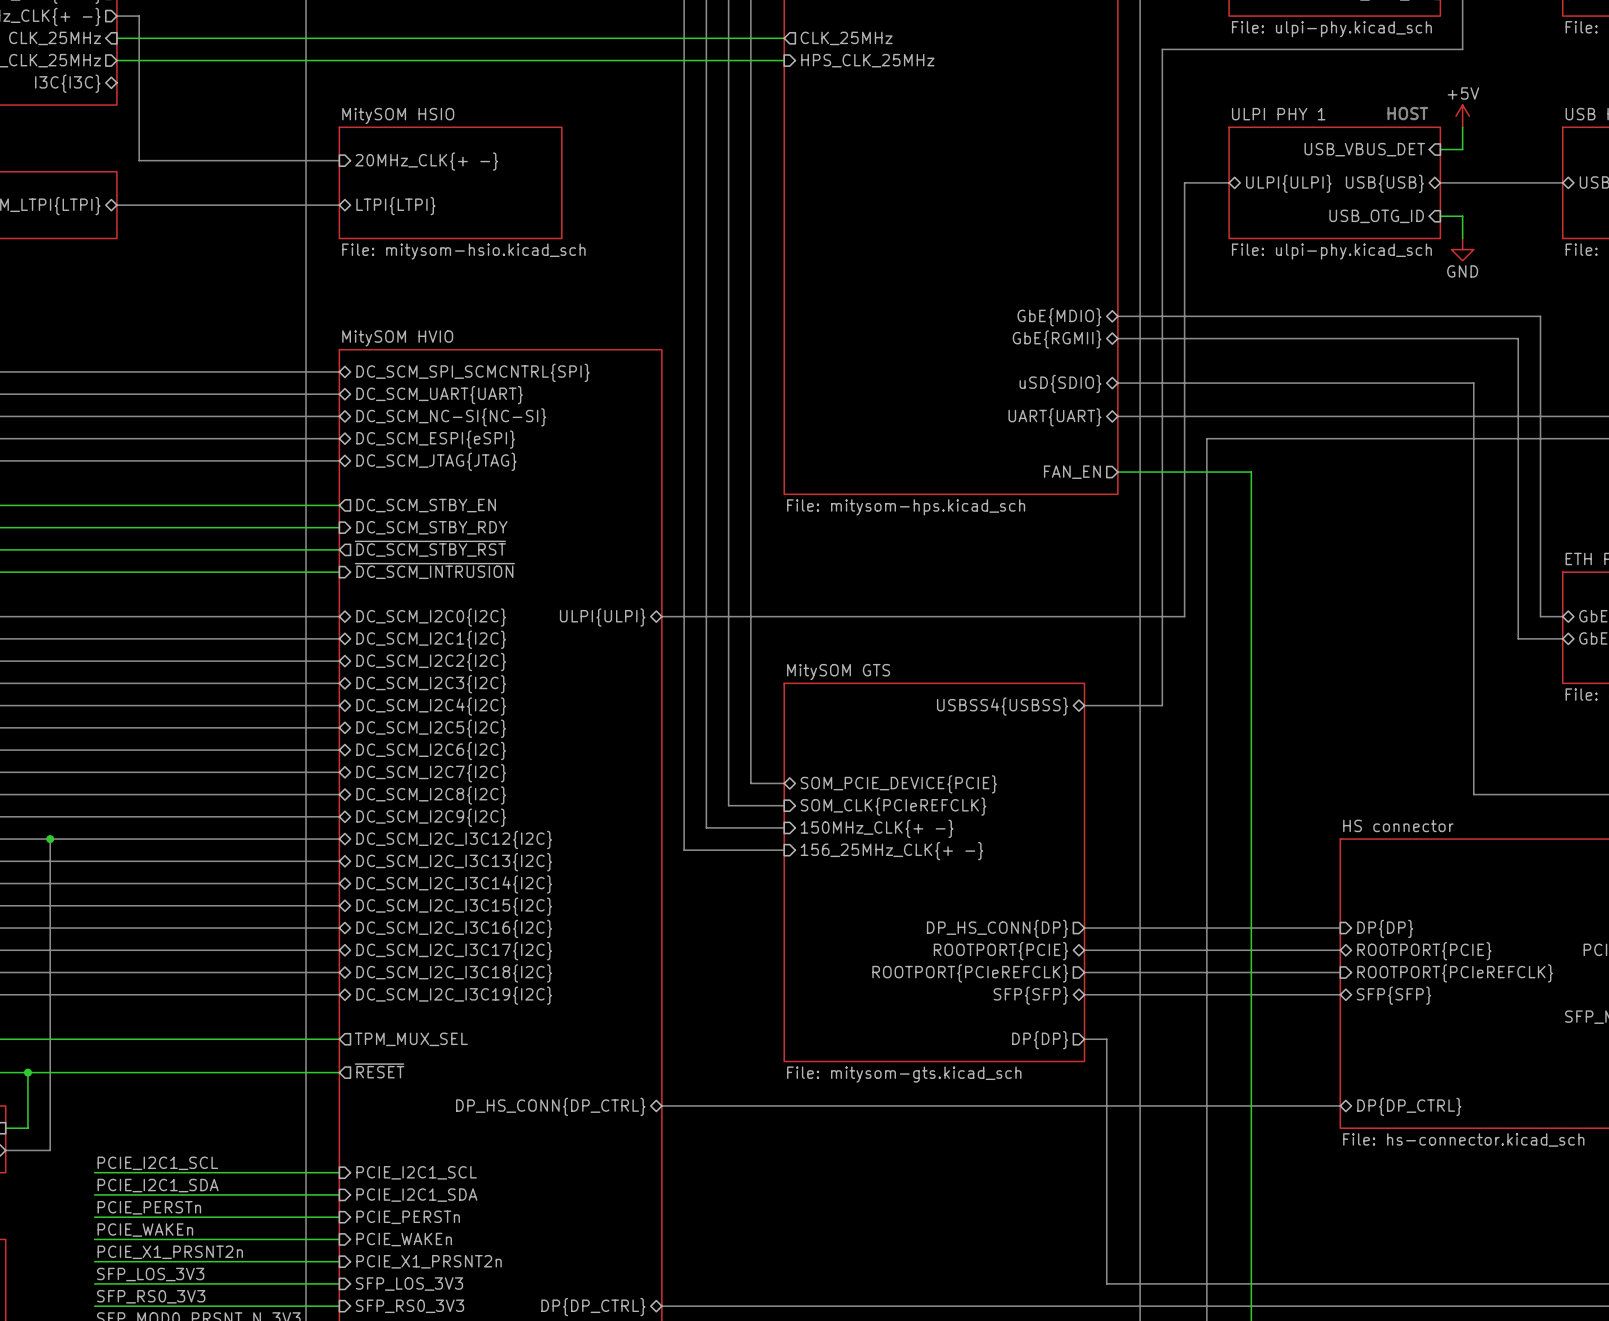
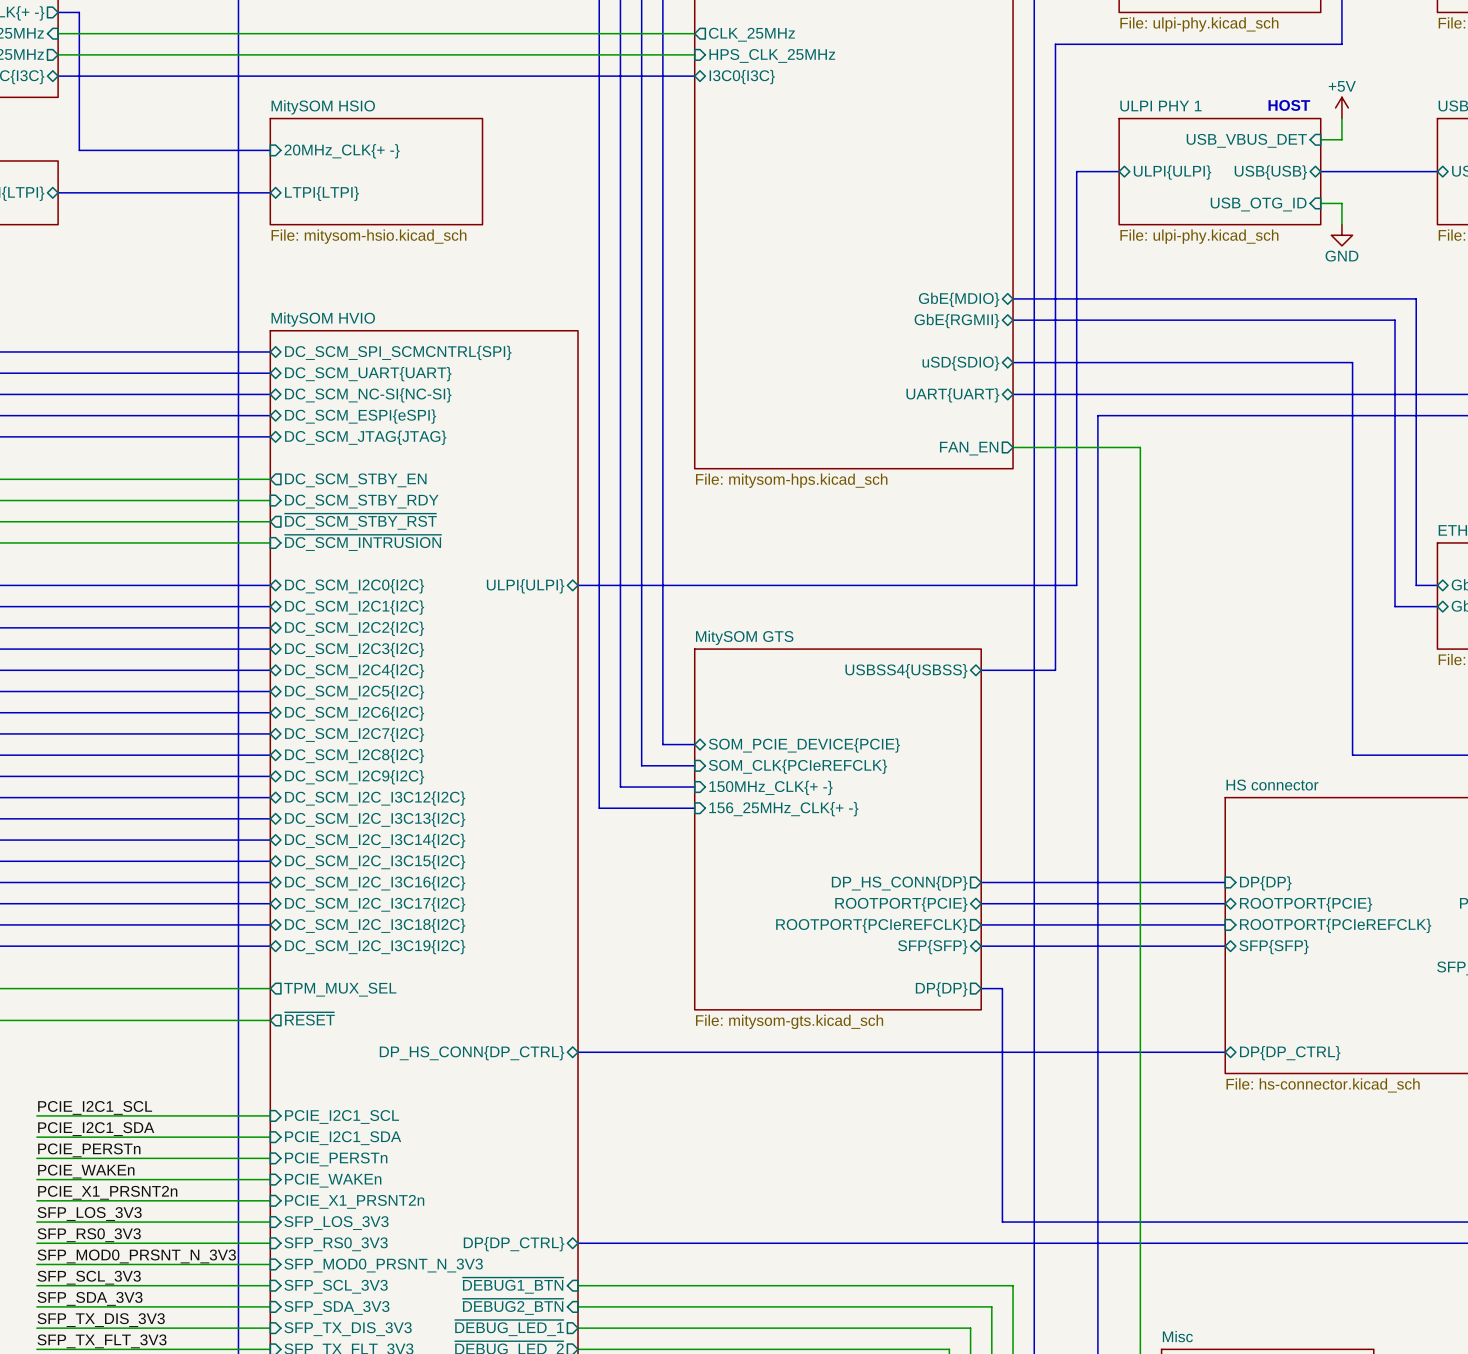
bus: none -> (58, 76) (694, 76)
sheet pin: none -> I3C0{I3C} (742, 77)

